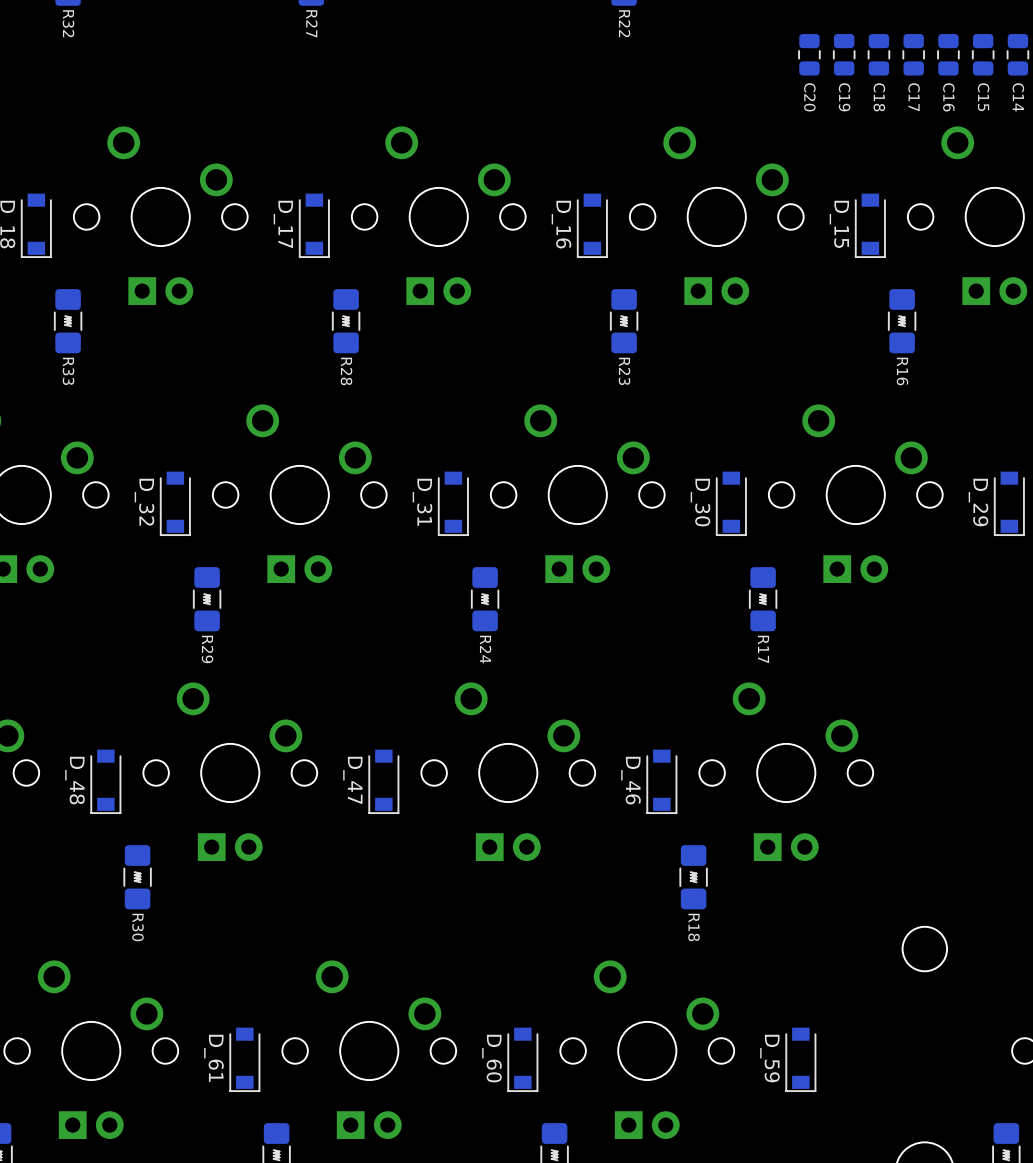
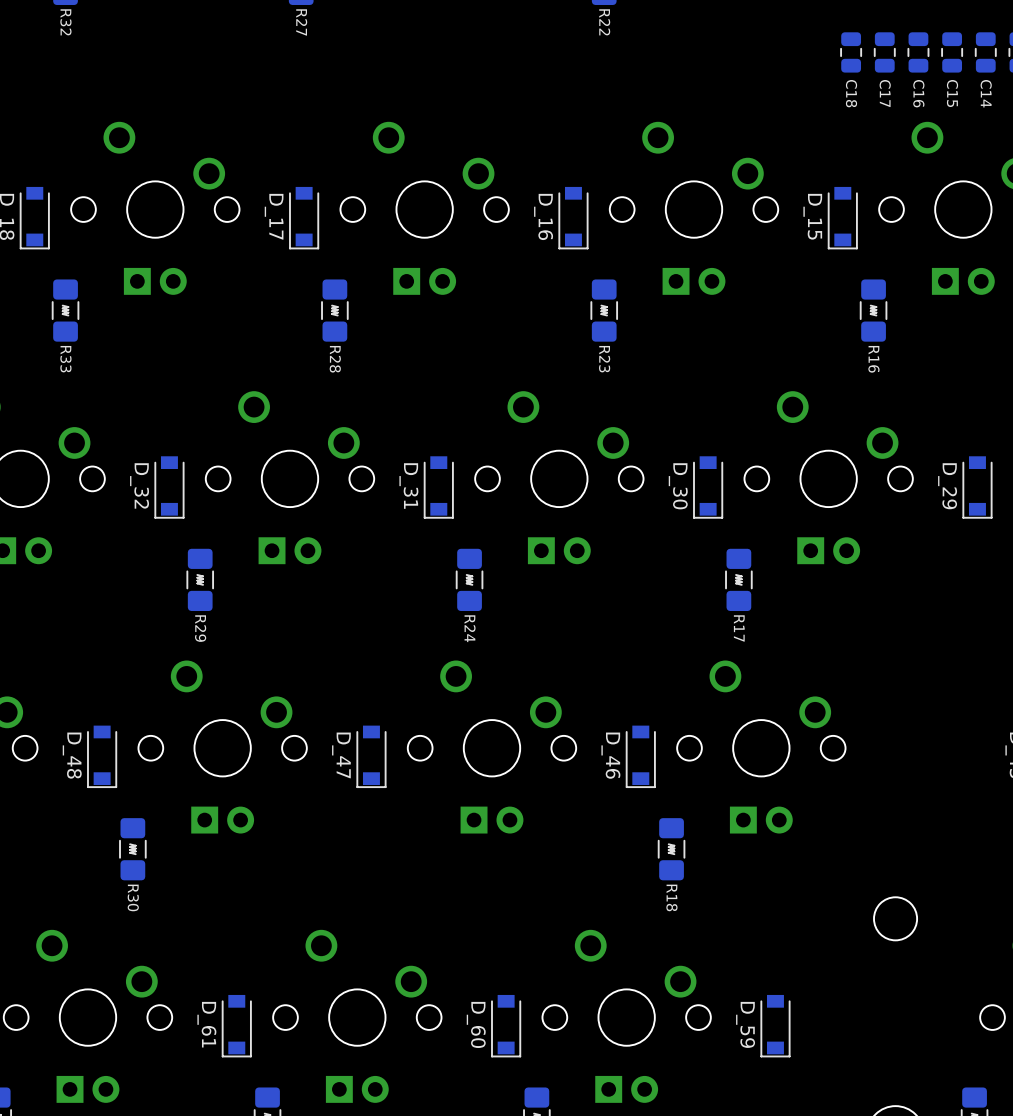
C20: (809, 54) -> none
C19: (844, 54) -> none

